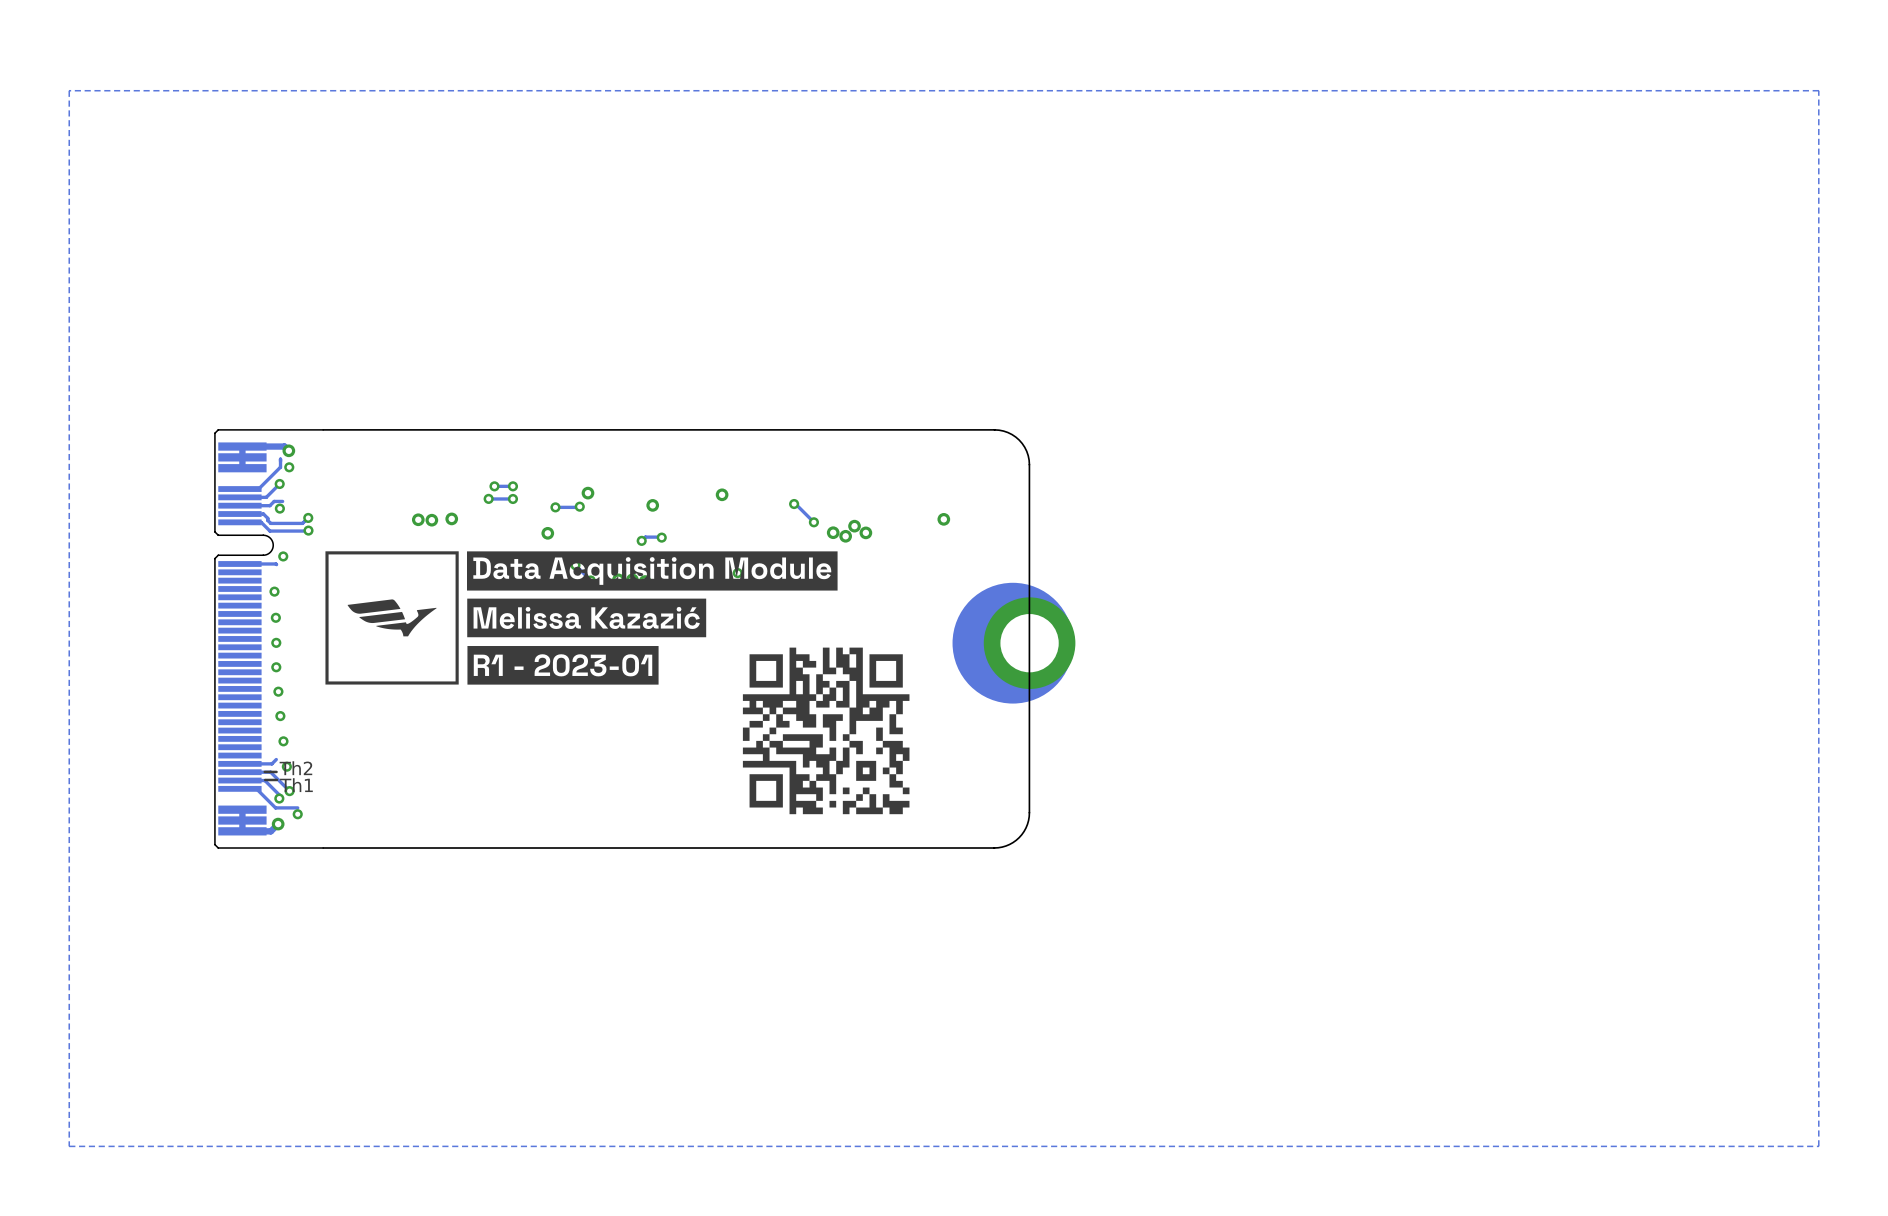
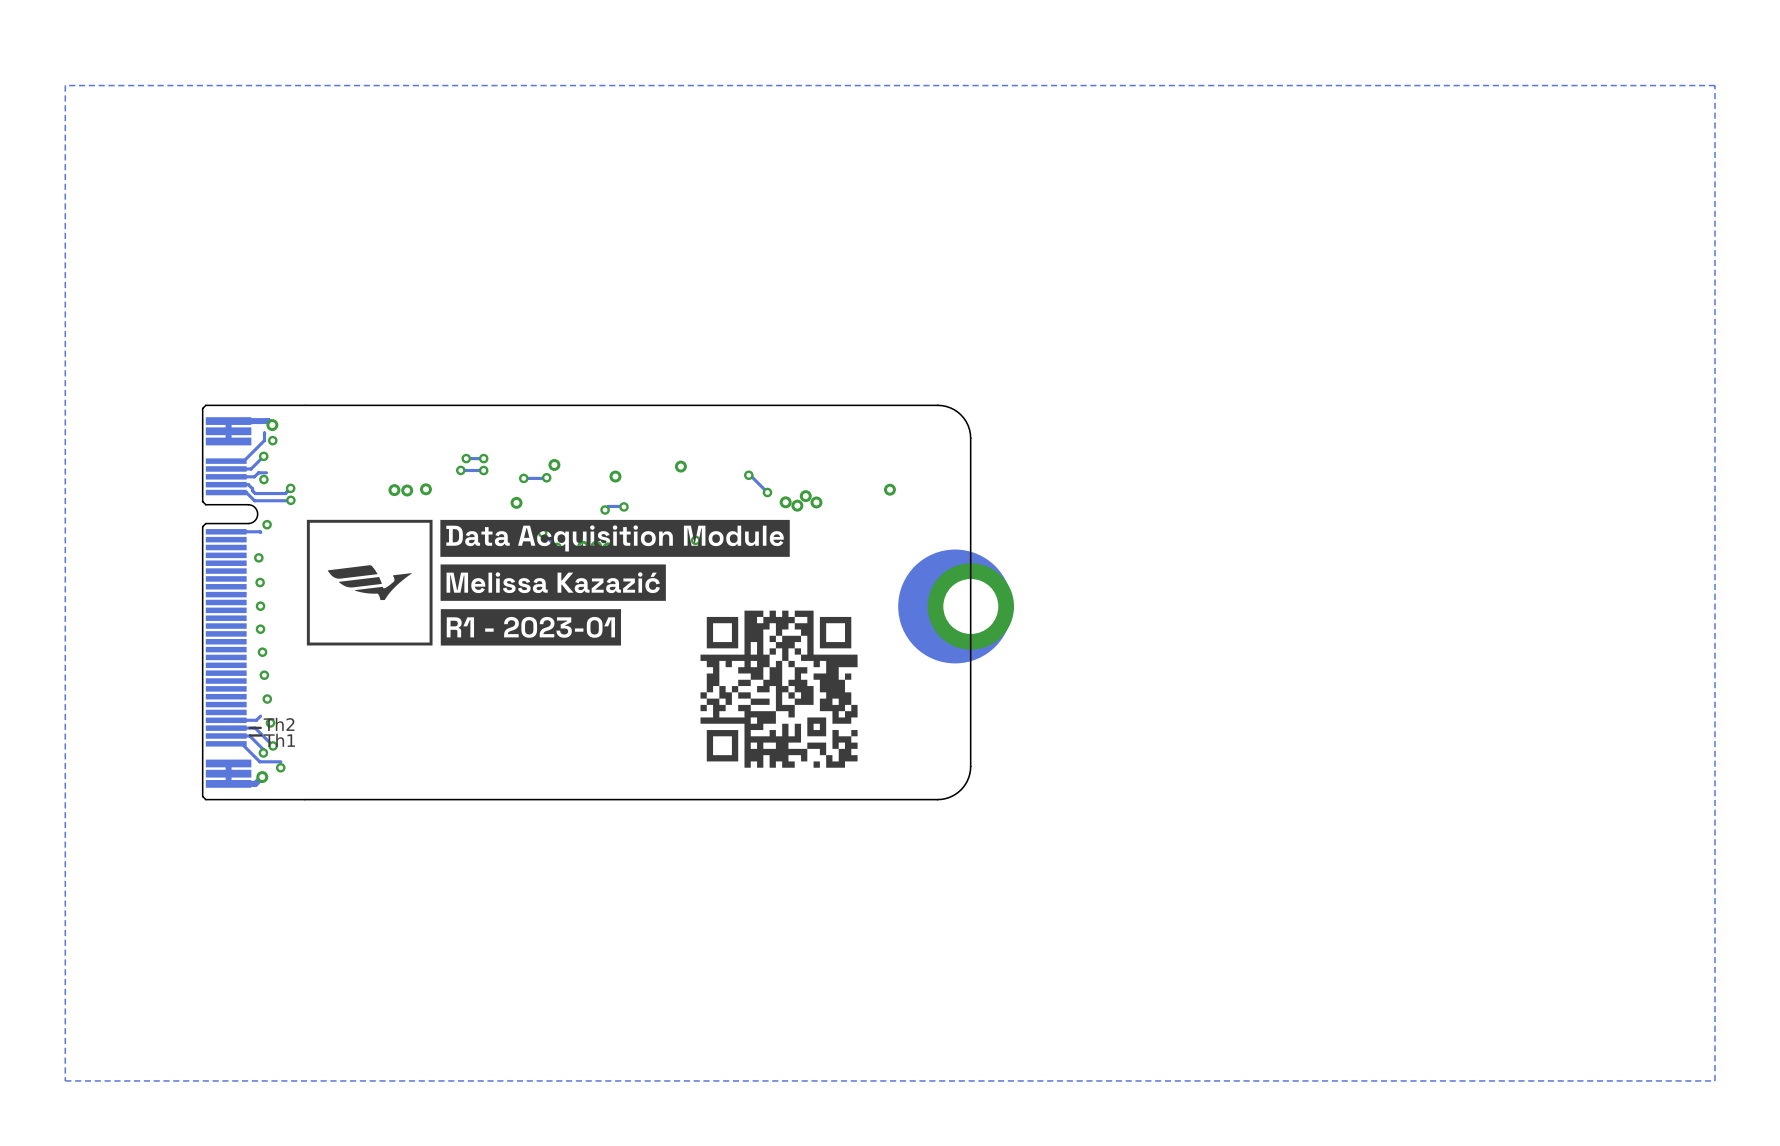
drawing shape: [742, 647, 910, 815] -> [700, 610, 858, 768]

